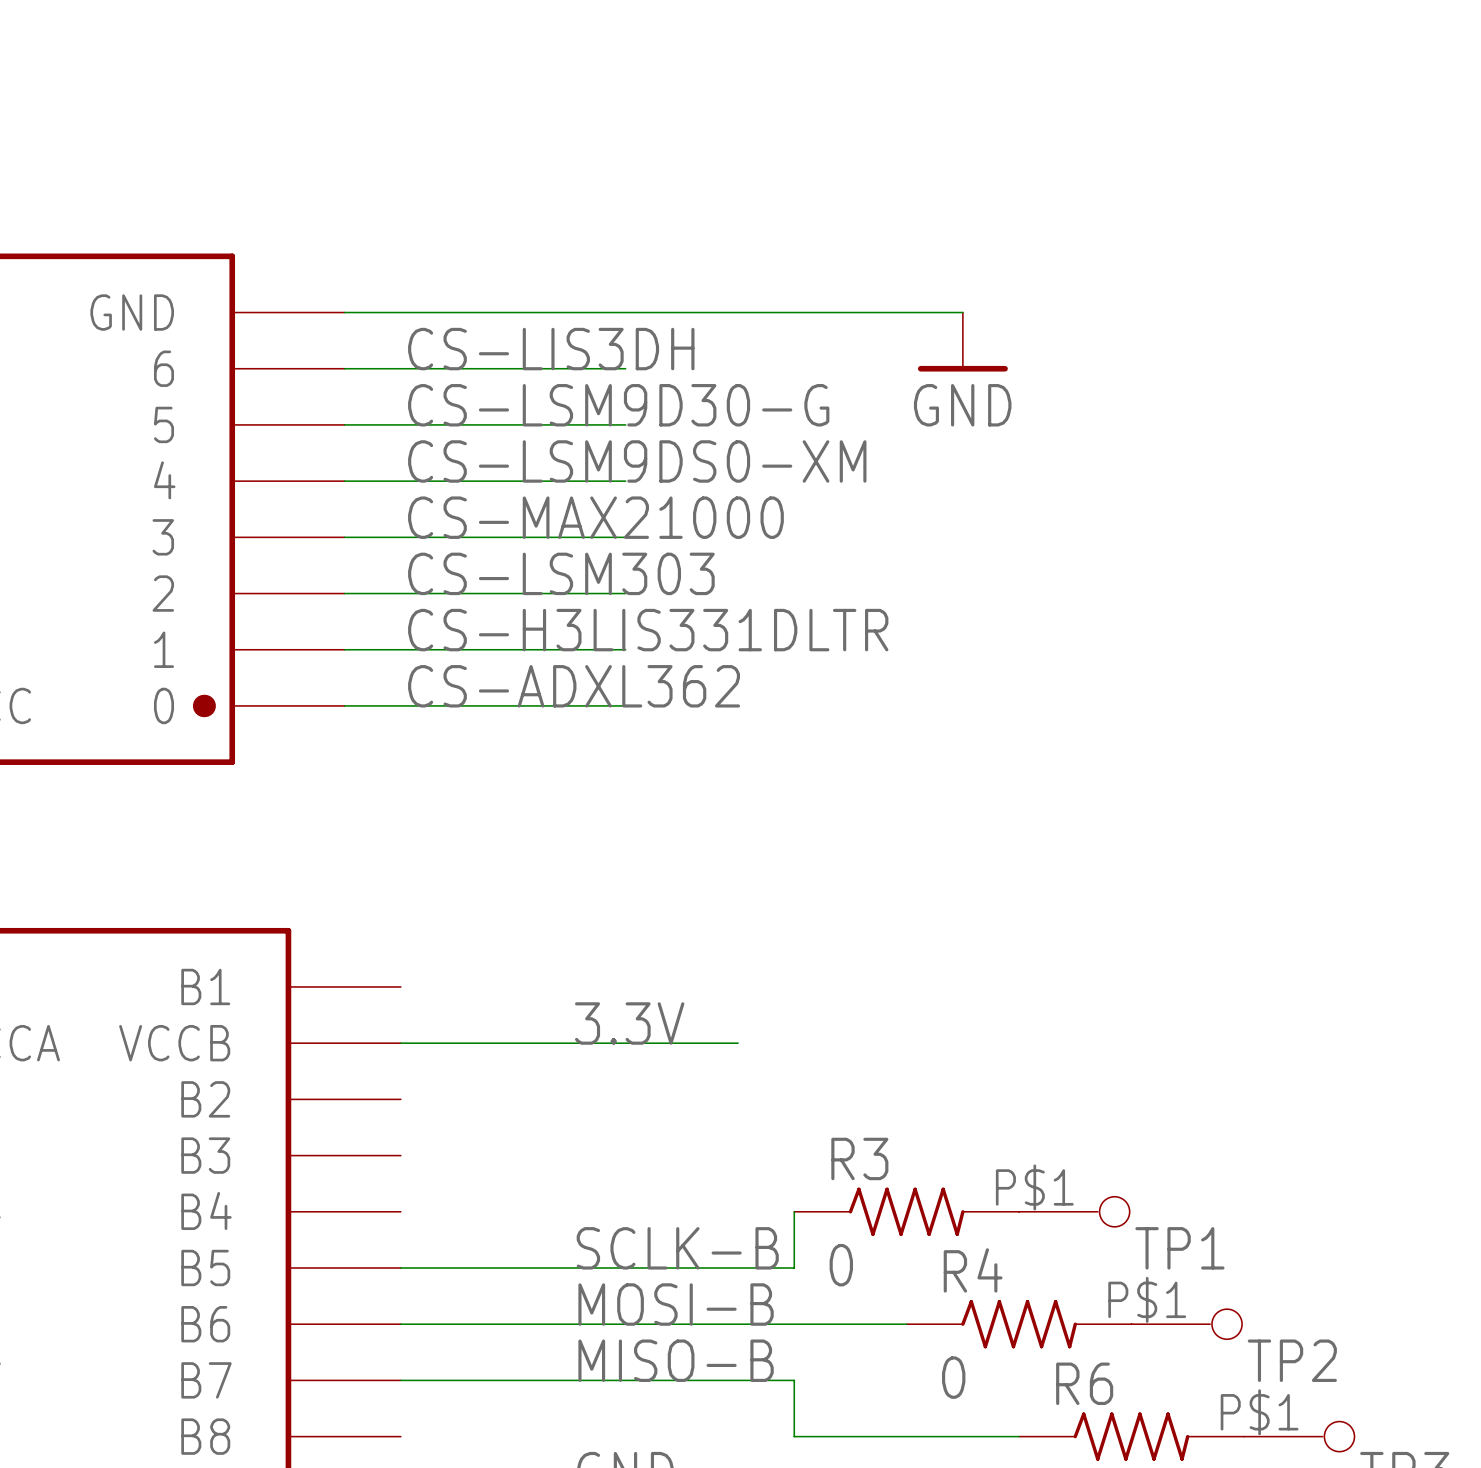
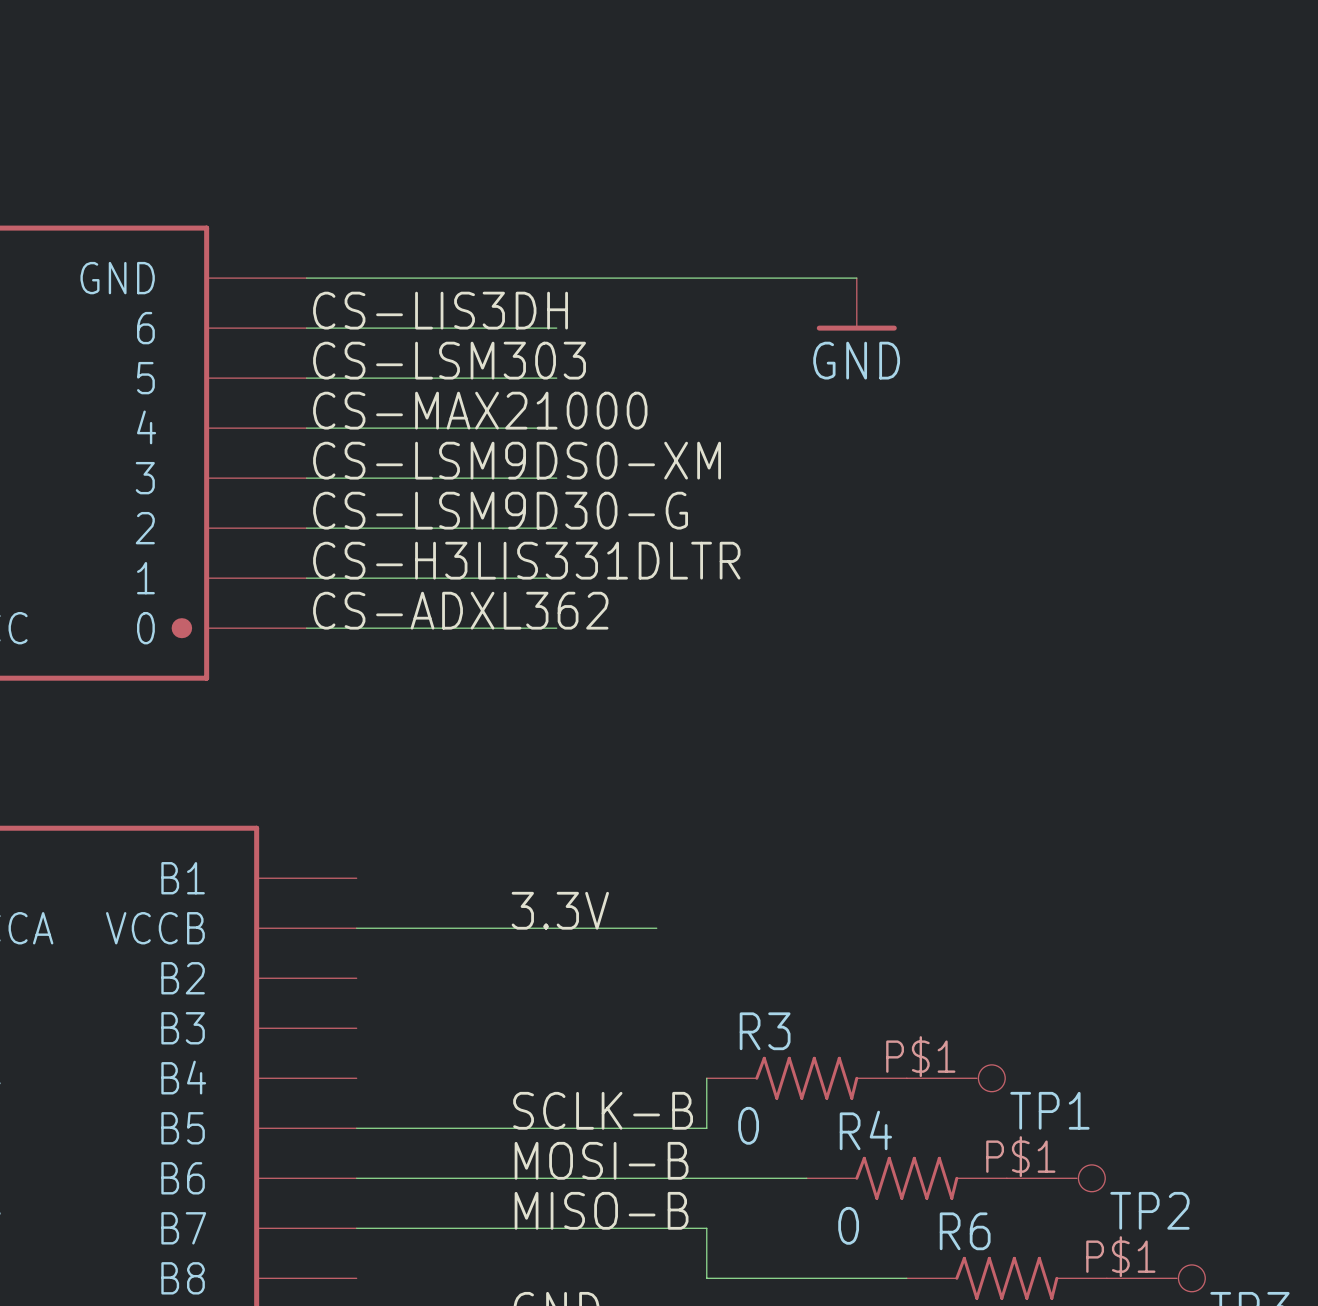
label position: CS-LIS3DH (551, 349) -> CS-LIS3DH (440, 310)
label position: CS-LSM9D30-G (618, 405) -> CS-LSM9D30-G (500, 510)
label position: CS-LSM9DS0-XM (637, 461) -> CS-LSM9DS0-XM (517, 460)
label position: CS-MAX21000 (595, 517) -> CS-MAX21000 (480, 410)
label position: CS-LSM303 (561, 573) -> CS-LSM303 (449, 360)
label position: CS-H3LIS331DLTR (648, 630) -> CS-H3LIS331DLTR (526, 560)
label position: CS-ADXL362 (574, 686) -> CS-ADXL362 (460, 610)

